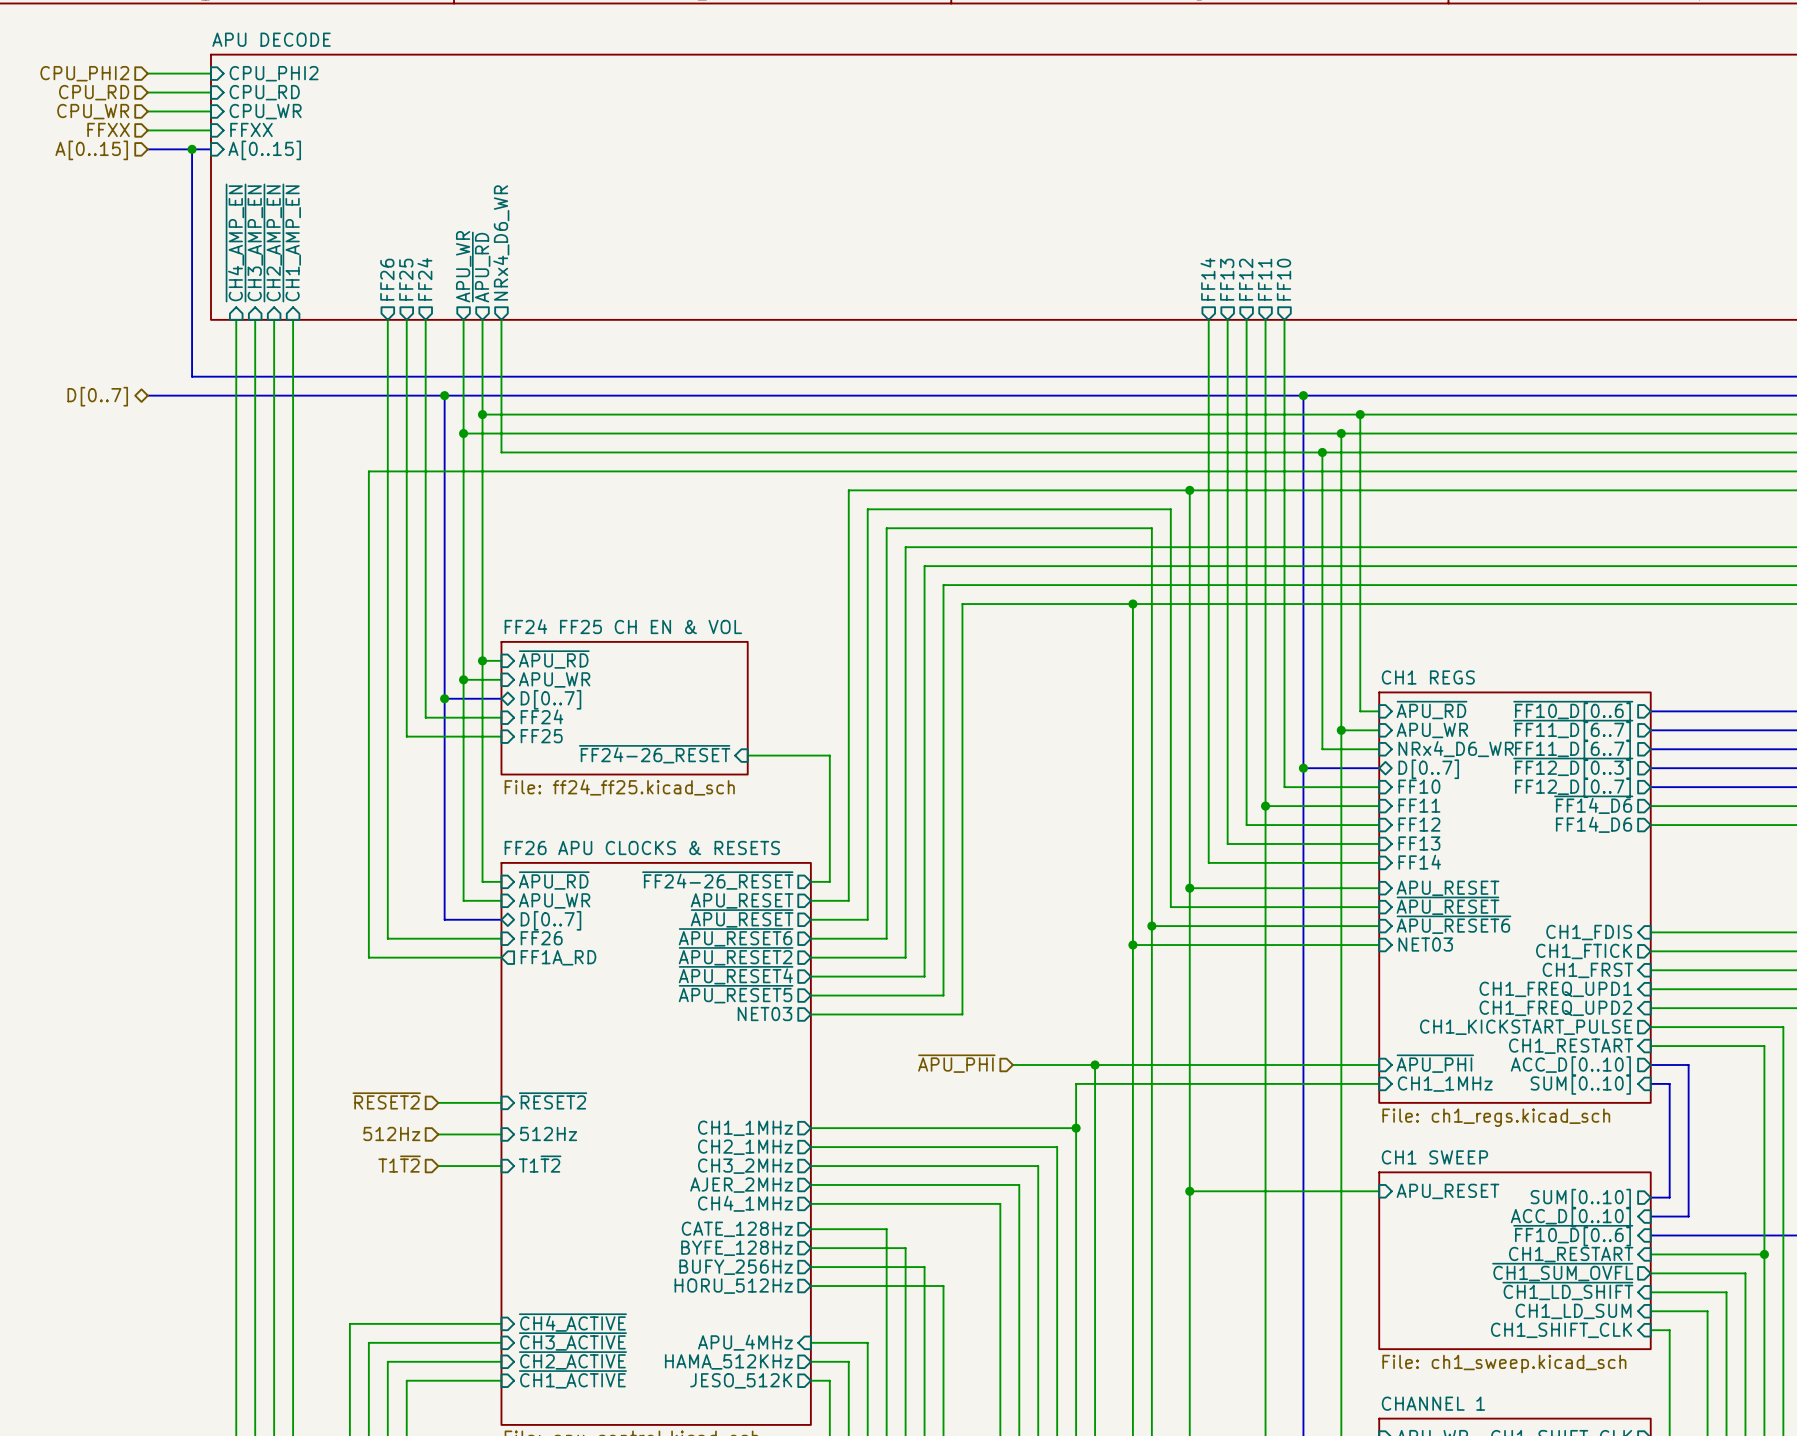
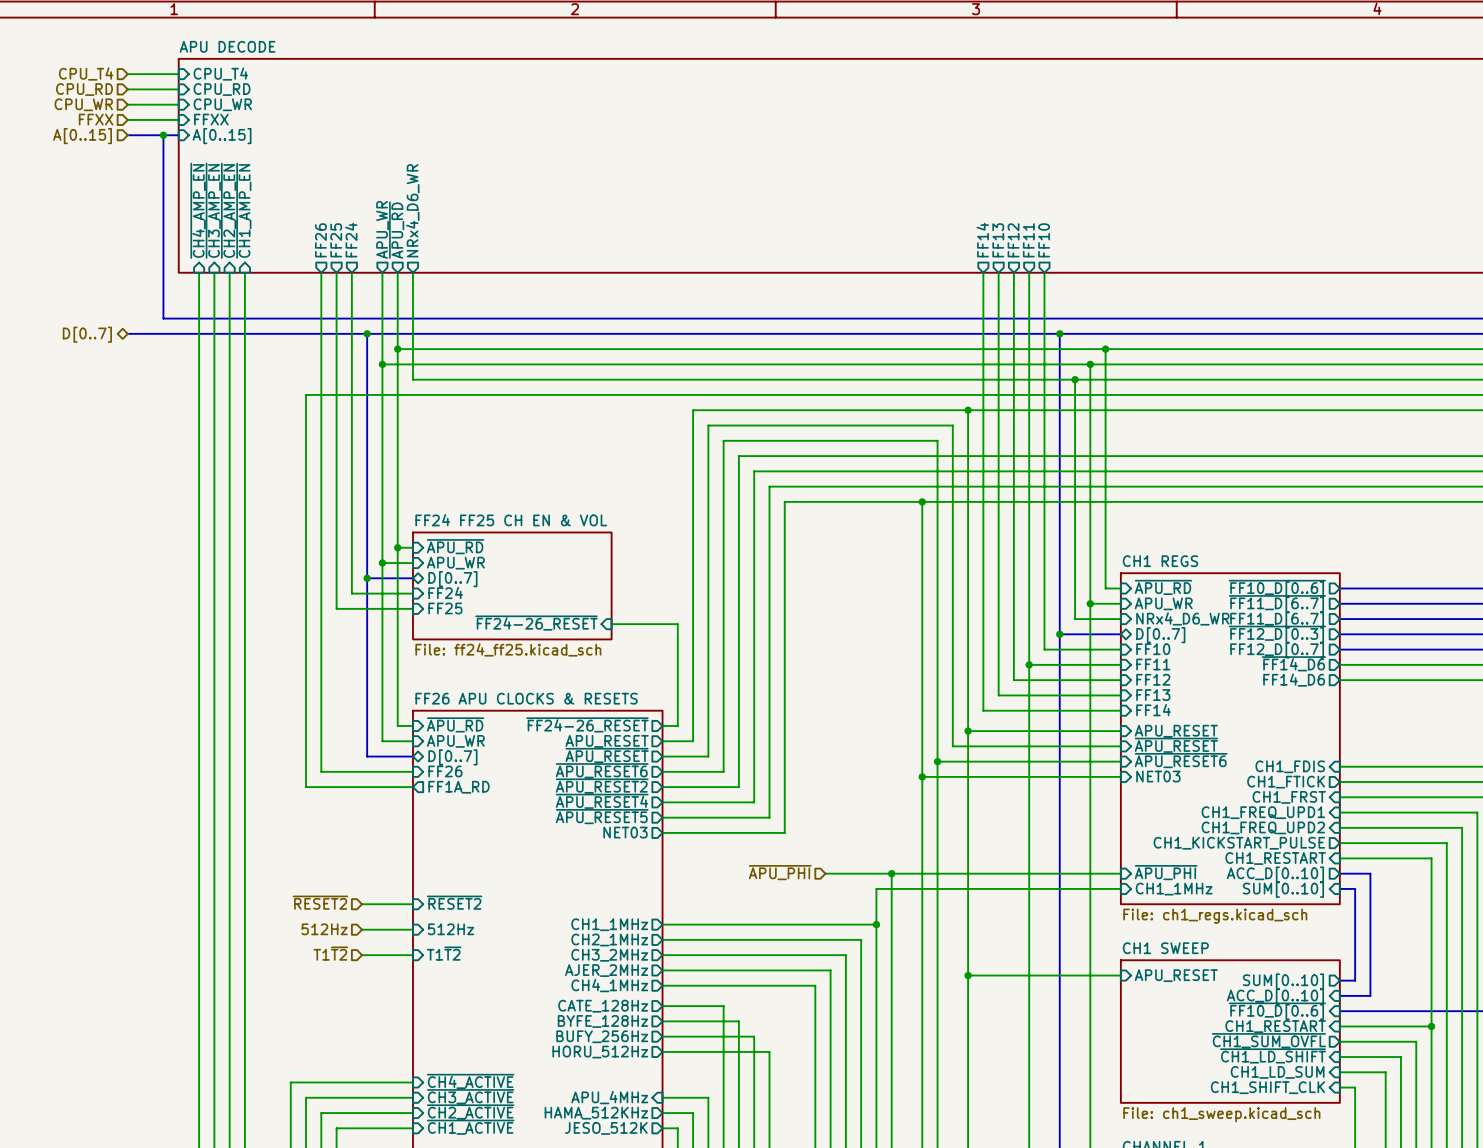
hierarchical label: CPU_PHI2 (84, 73) -> CPU_T4 (86, 73)
sheet pin: CPU_PHI2 (274, 73) -> CPU_T4 (220, 73)

